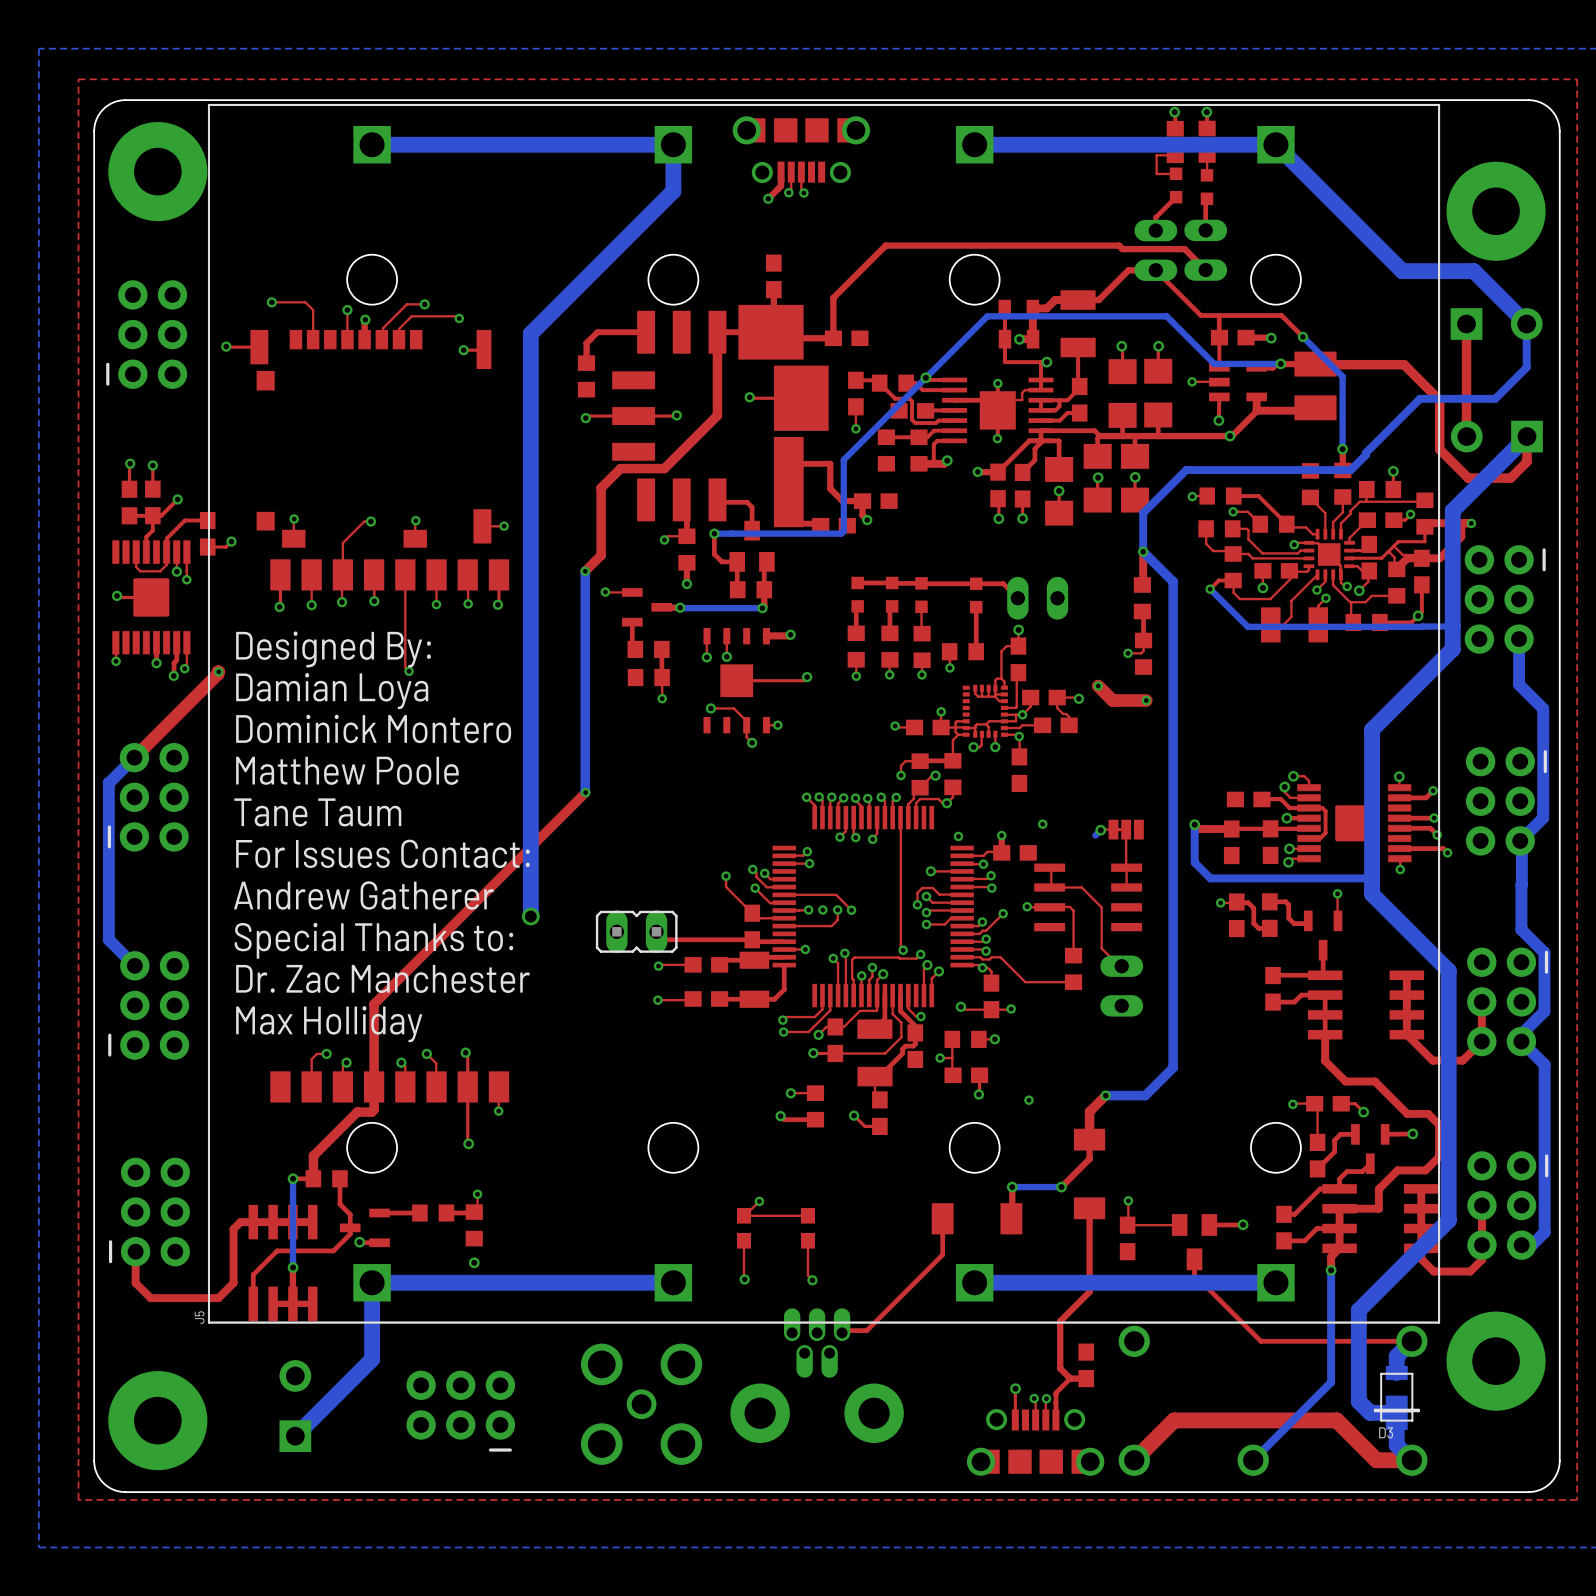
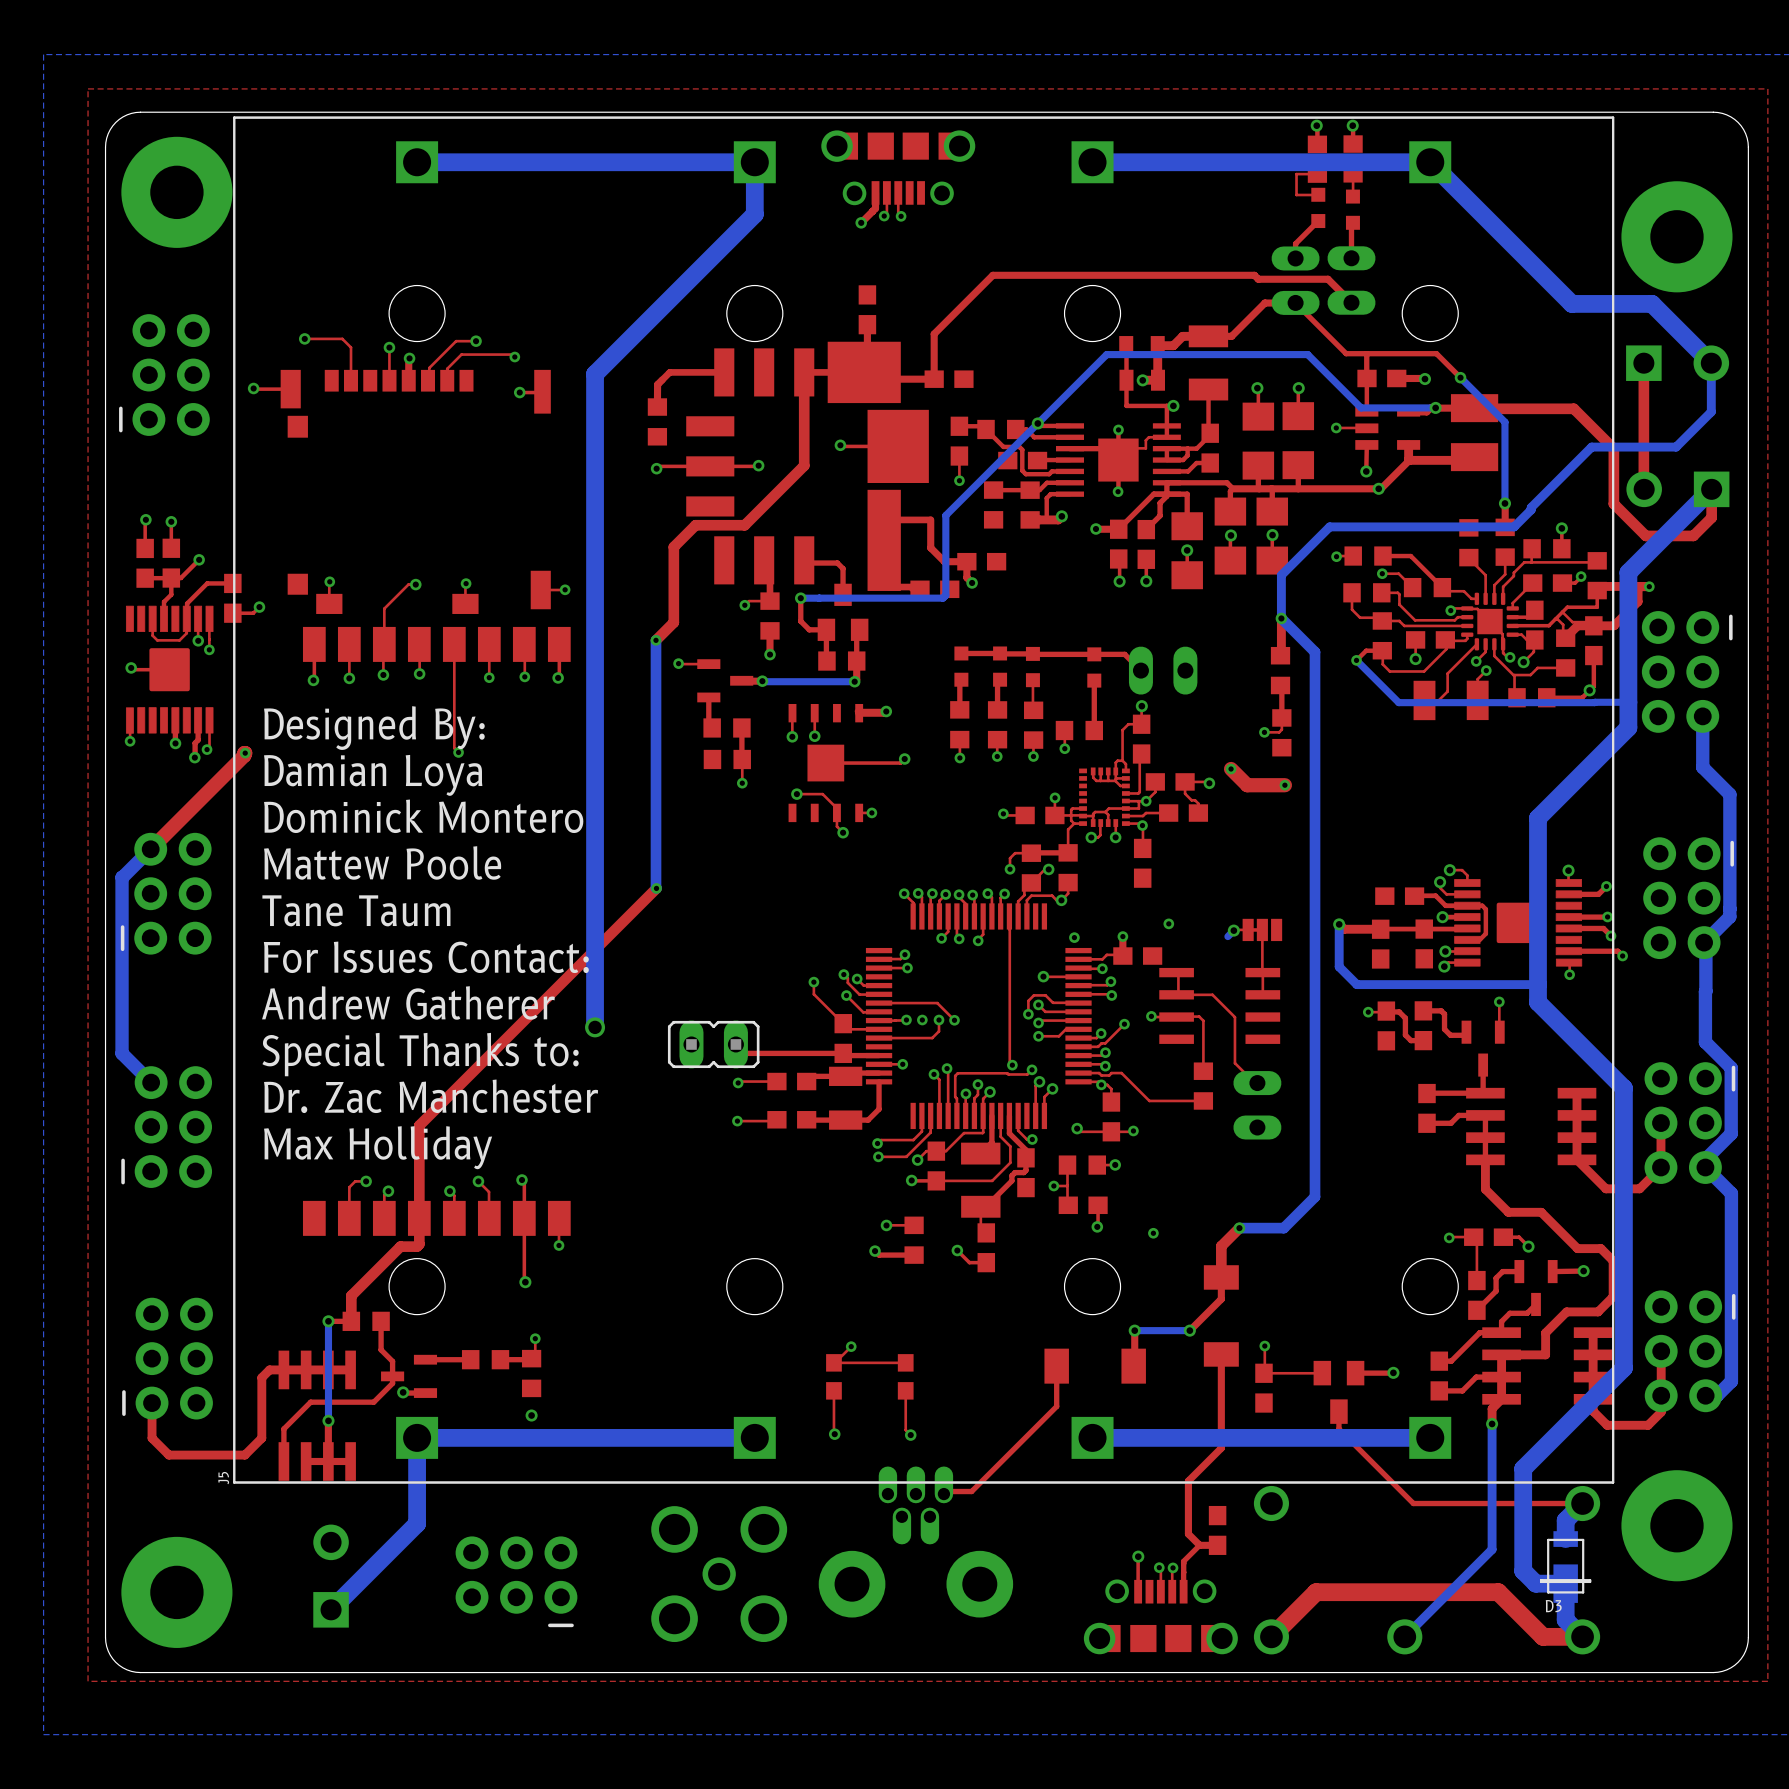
text: Matthew Poole (347, 770) -> Mattew Poole (382, 862)

